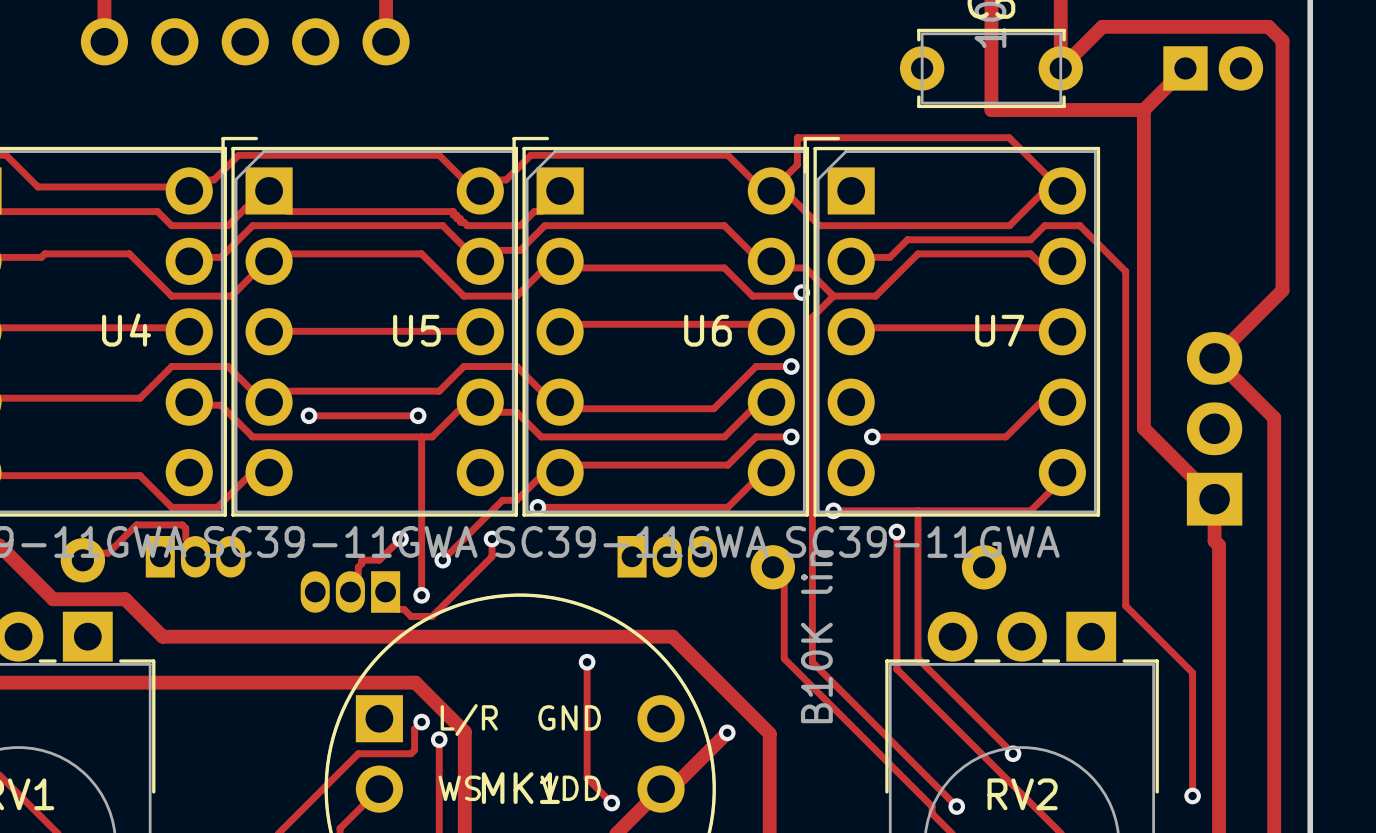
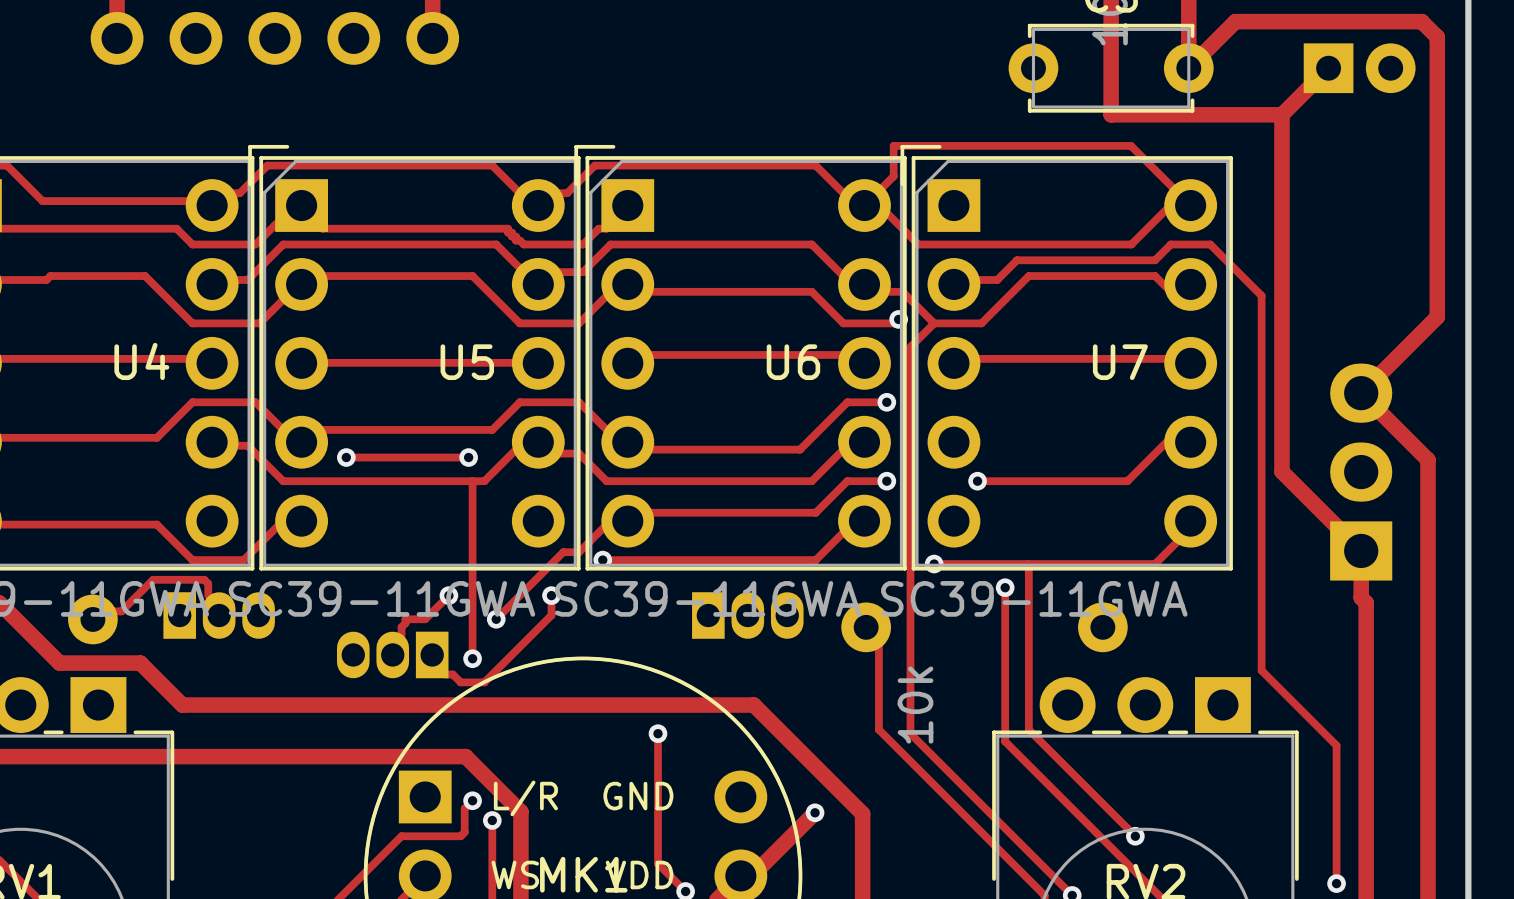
RV2 value: B10K lin (816, 636) -> 10k (915, 705)

